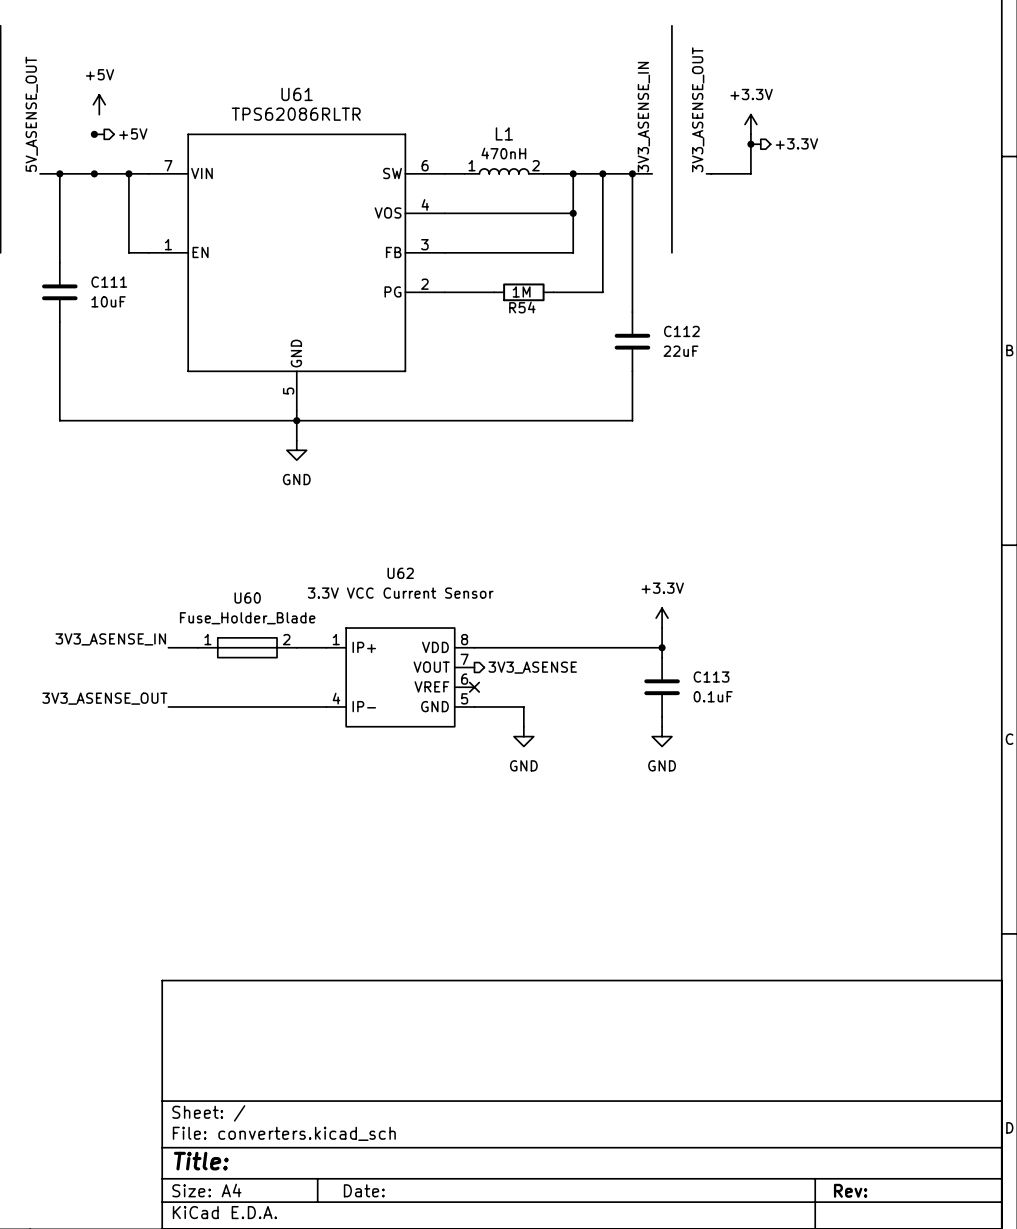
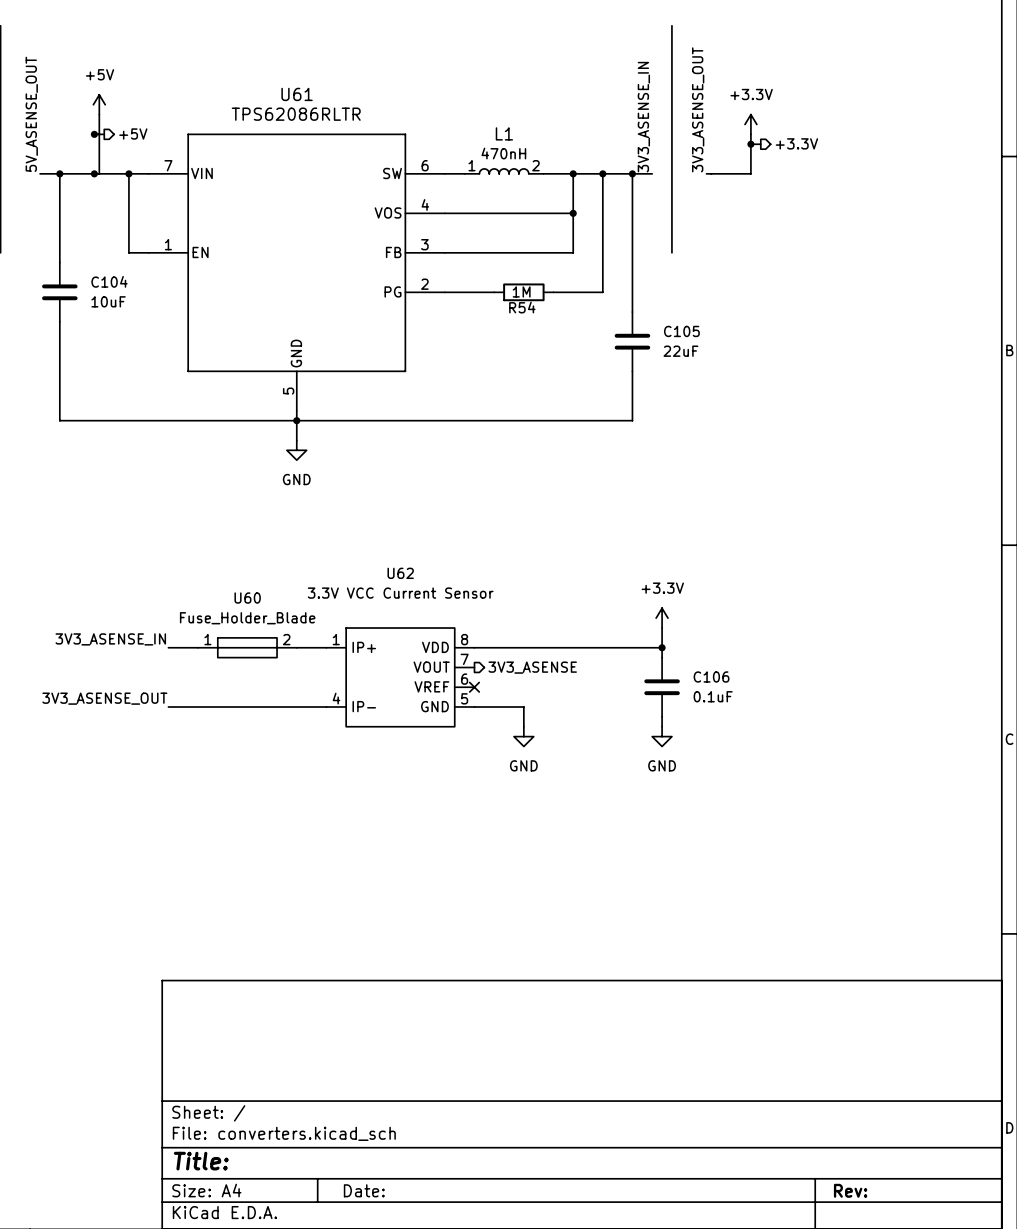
wire: none -> (99, 114) (99, 173)
C111 name: C111 (109, 282) -> C104 (109, 281)
C112 name: C112 (681, 331) -> C105 (681, 331)
C113 name: C113 (711, 677) -> C106 (711, 677)

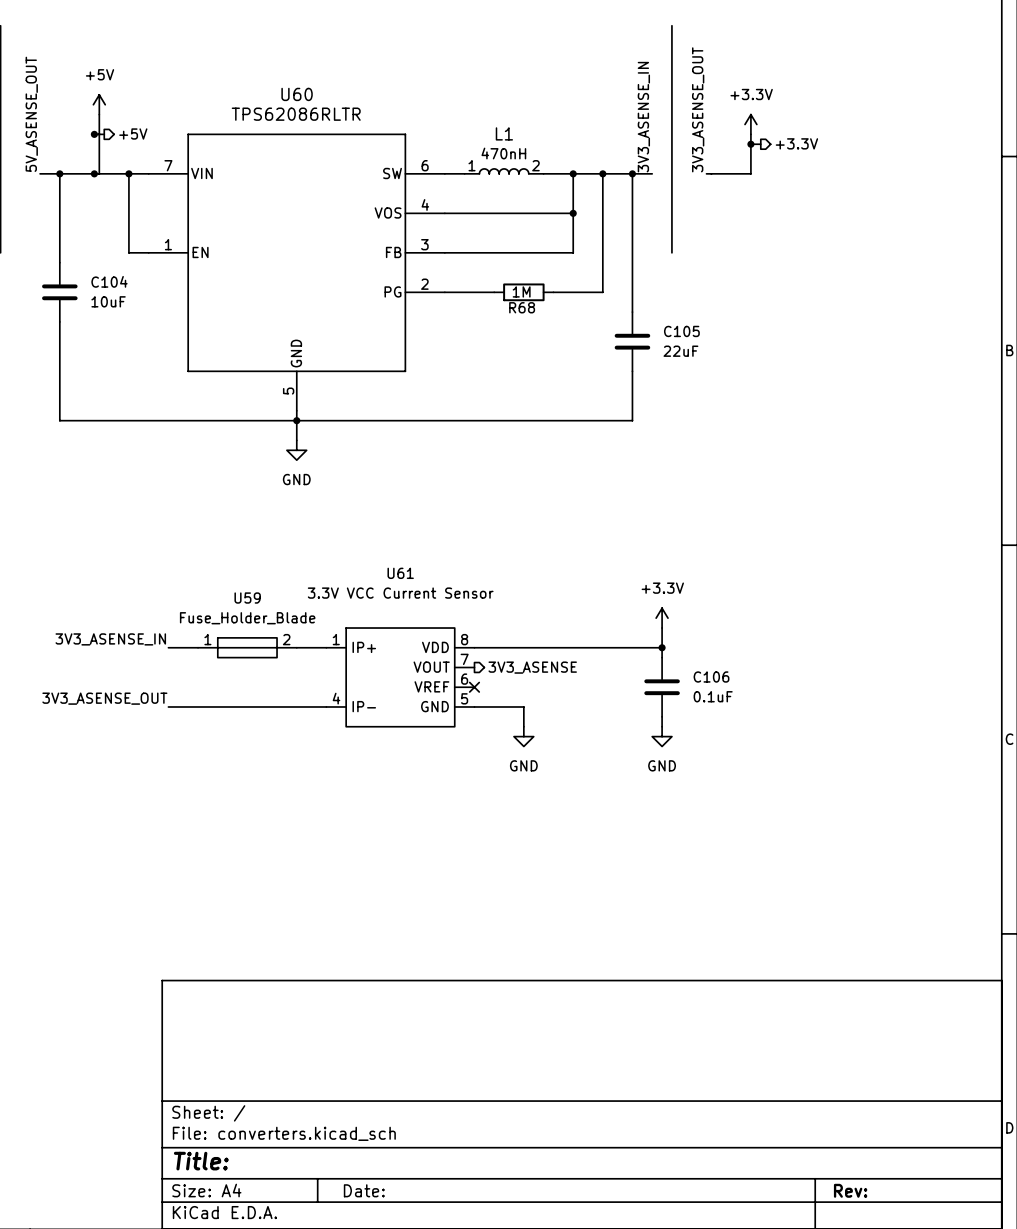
U61 name: U61 (297, 94) -> U60 (297, 94)
R54 name: R54 (522, 307) -> R68 (522, 307)
U62 name: U62 (400, 573) -> U61 (400, 573)
U60 name: U60 (247, 598) -> U59 (247, 598)

